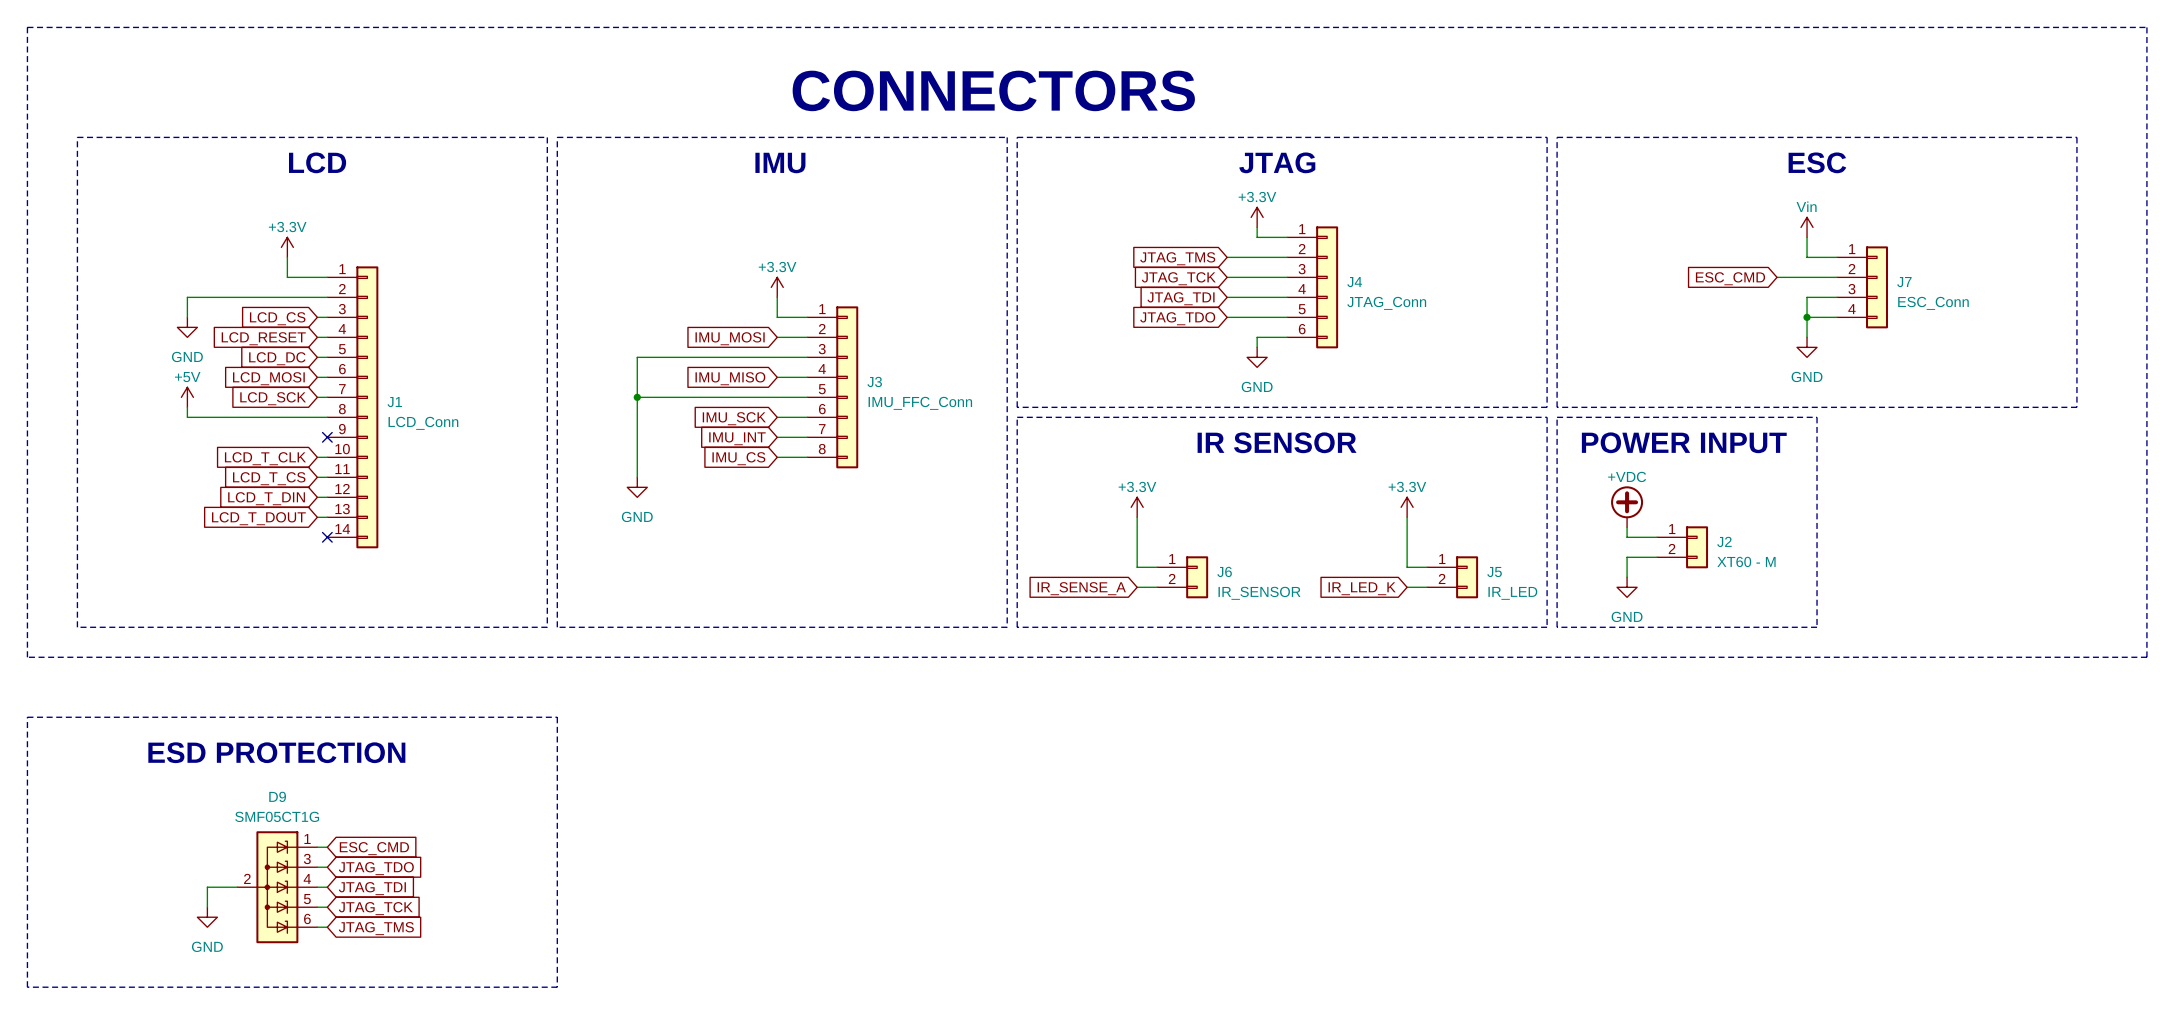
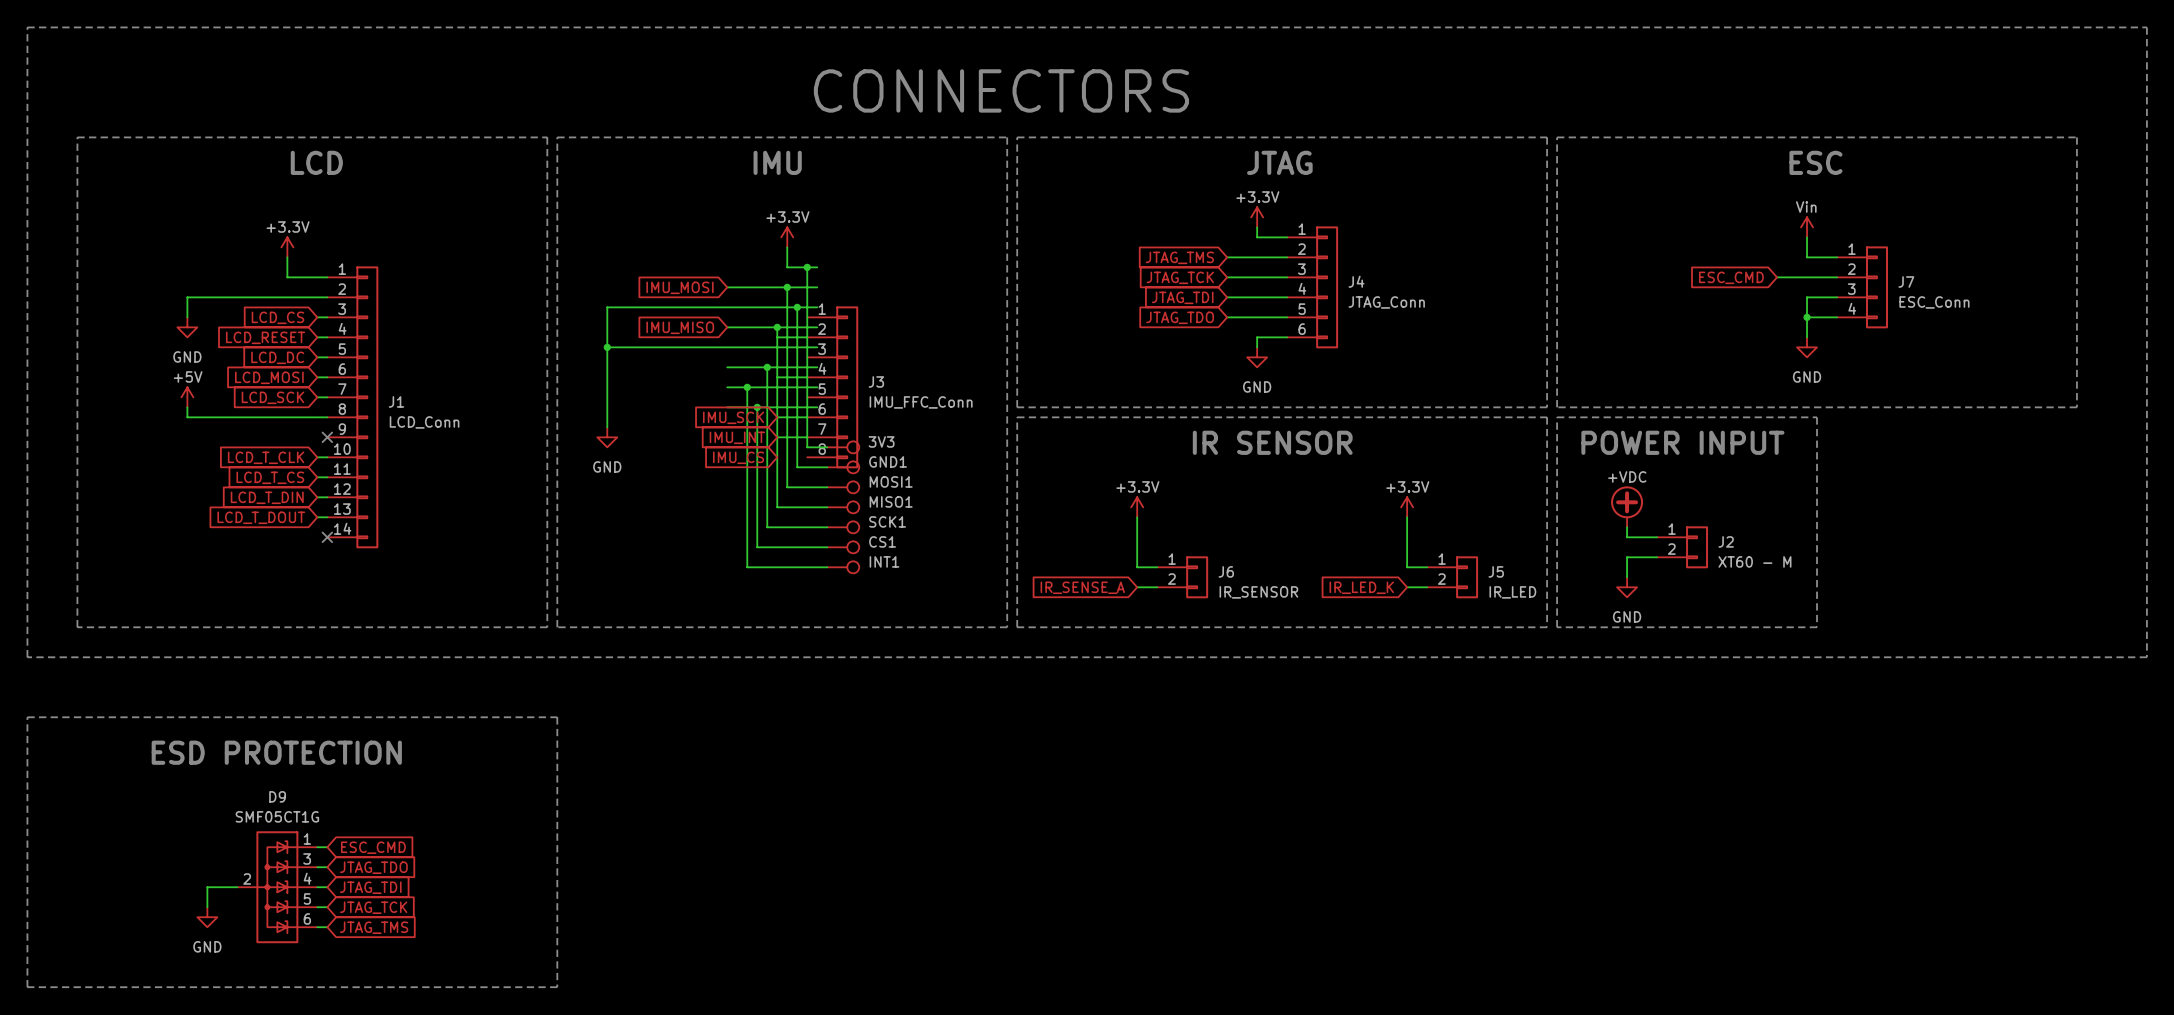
wire: none -> (807, 267) (807, 447) (827, 447)
junction: none -> (807, 267)
wire: none -> (727, 287) (817, 287)
power symbol position: +3.3V (777, 287) -> +3.3V (787, 237)
wire: none -> (787, 287) (787, 487) (827, 487)
junction: none -> (787, 287)
wire: (777, 297) (777, 317) (807, 317) -> (787, 247) (787, 267) (817, 267)
wire: none -> (797, 307) (797, 467) (827, 467)
junction: none -> (797, 307)
wire: none -> (817, 307) (607, 307) (607, 427)
wire: none -> (727, 327) (817, 327)
wire: none -> (777, 327) (777, 507) (827, 507)
junction: none -> (777, 327)
global label position: IMU_MOSI (730, 338) -> IMU_MOSI (680, 287)
wire: none -> (607, 347) (817, 347)
junction: none -> (607, 347)
wire: (807, 357) (637, 357) (637, 477) -> none
wire: none -> (727, 367) (817, 367)
wire: none -> (767, 367) (767, 527) (827, 527)
junction: none -> (767, 367)
global label position: IMU_MISO (730, 378) -> IMU_MISO (680, 327)
wire: none -> (727, 387) (817, 387)
wire: none -> (747, 387) (747, 567) (827, 567)
junction: none -> (747, 387)
wire: (637, 397) (807, 397) -> none
junction: (637, 397) -> none
wire: none -> (727, 407) (817, 407)
wire: none -> (757, 407) (757, 547) (827, 547)
junction: none -> (757, 407)
3V3: none -> (843, 447)
wire: (777, 457) (807, 457) -> none
GND1: none -> (843, 467)
power symbol position: GND (637, 487) -> GND (607, 437)
MOSI1: none -> (843, 487)
MISO1: none -> (843, 507)
SCK1: none -> (843, 527)
CS1: none -> (843, 547)
INT1: none -> (843, 567)

